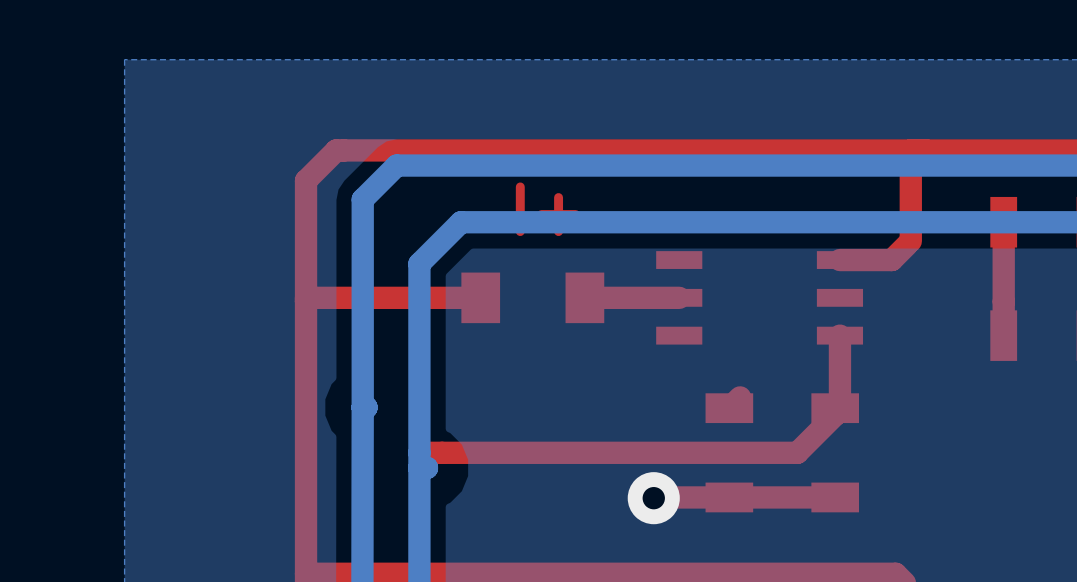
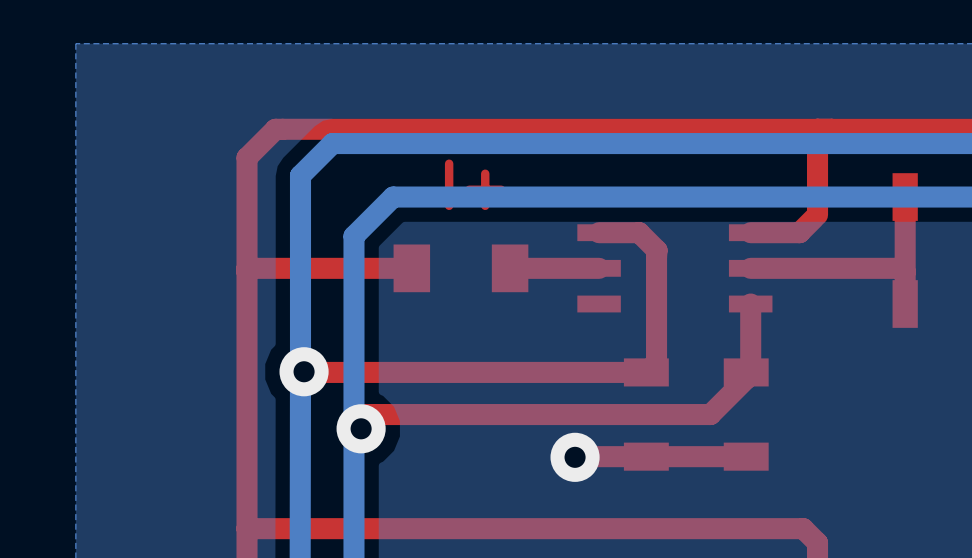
top track: none -> (599, 232) (639, 232) (657, 250) (656, 362)
top track: none -> (750, 268) (899, 268) (905, 271)
top track: none -> (304, 371) (646, 372)
via: none -> (304, 371)
via: none -> (361, 428)

